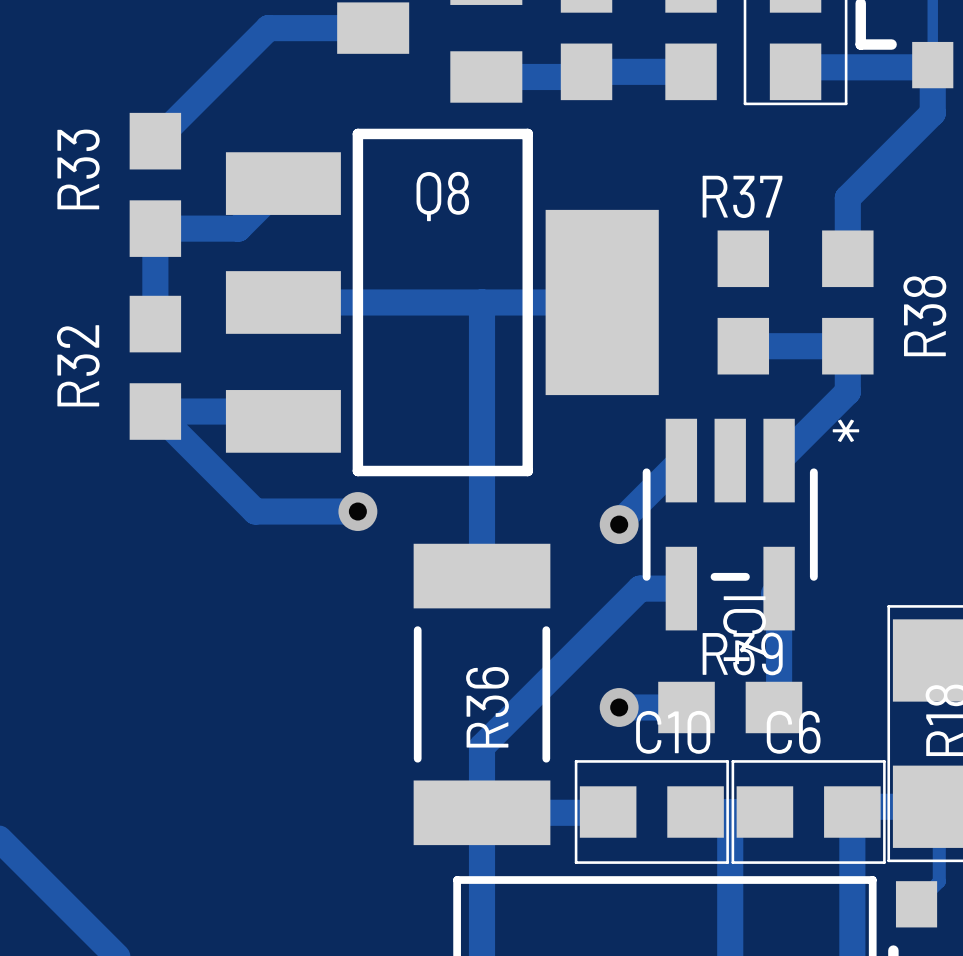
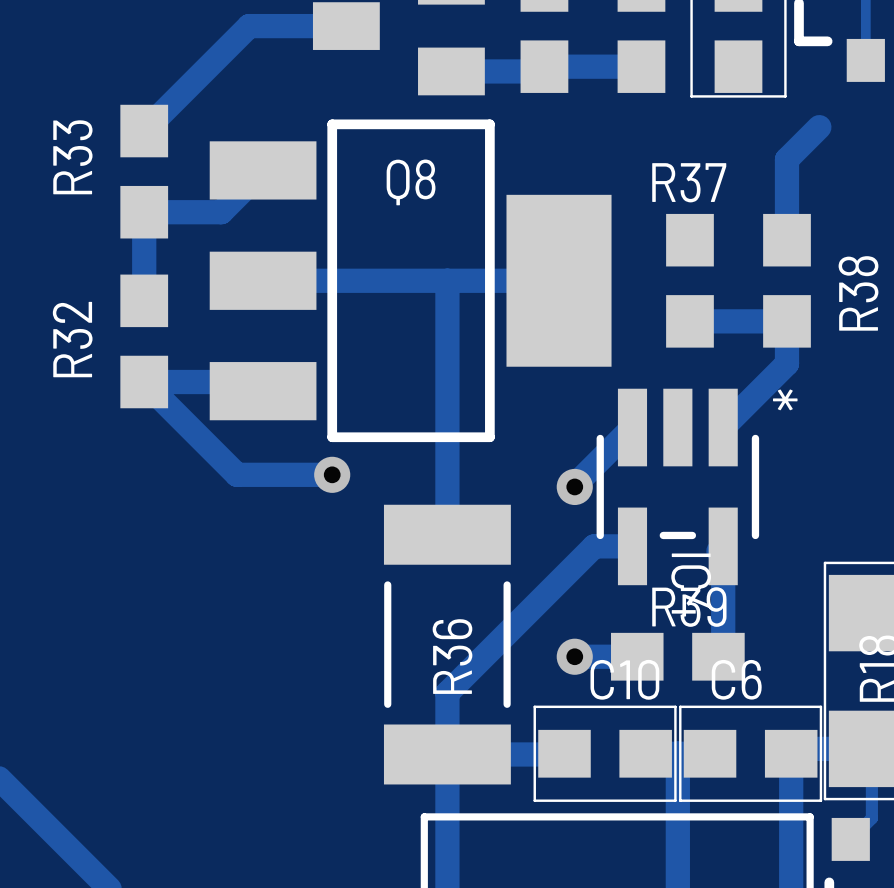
track: (932, 54) (932, 113) (847, 197) -> (819, 127) (787, 159) (787, 183)
track: (932, 67) (800, 67) (795, 71) -> none

